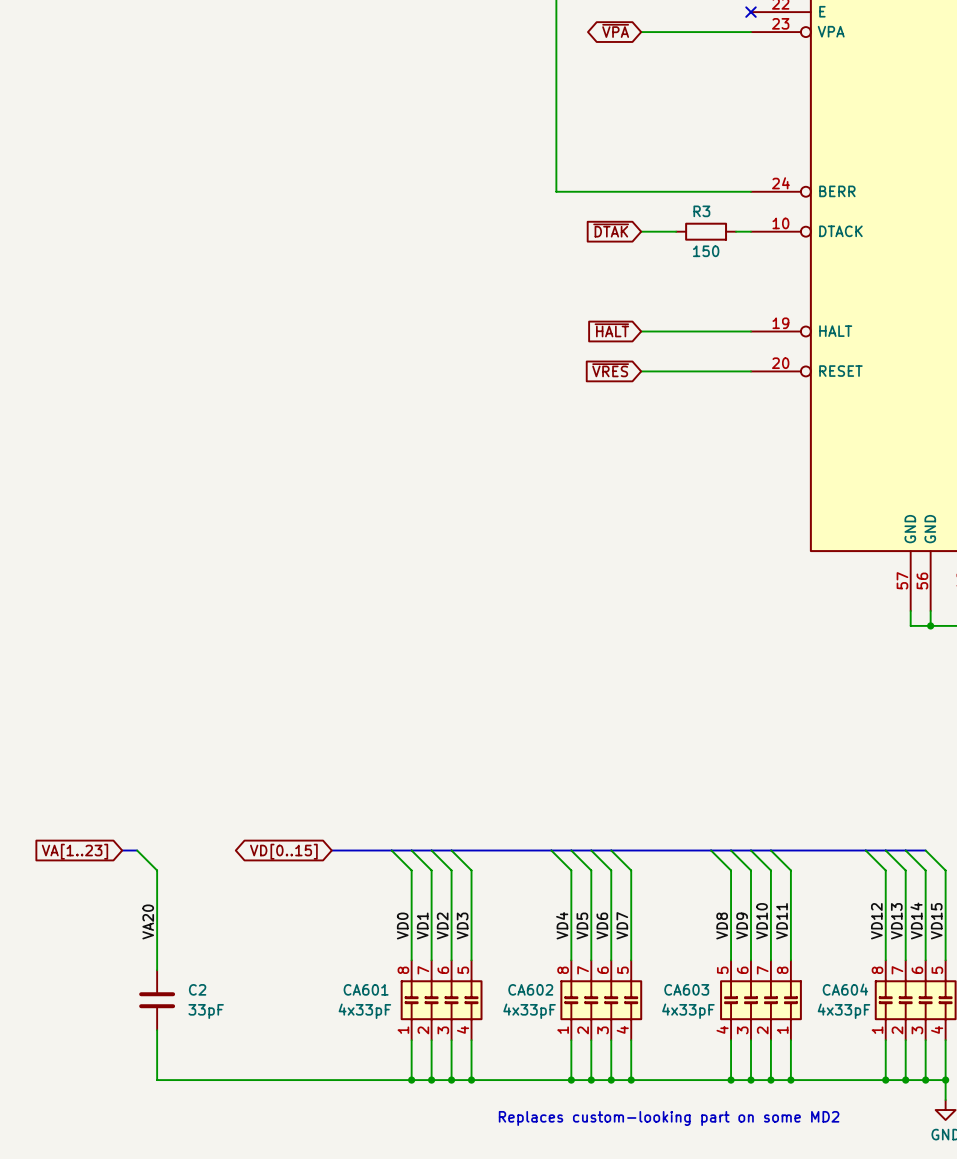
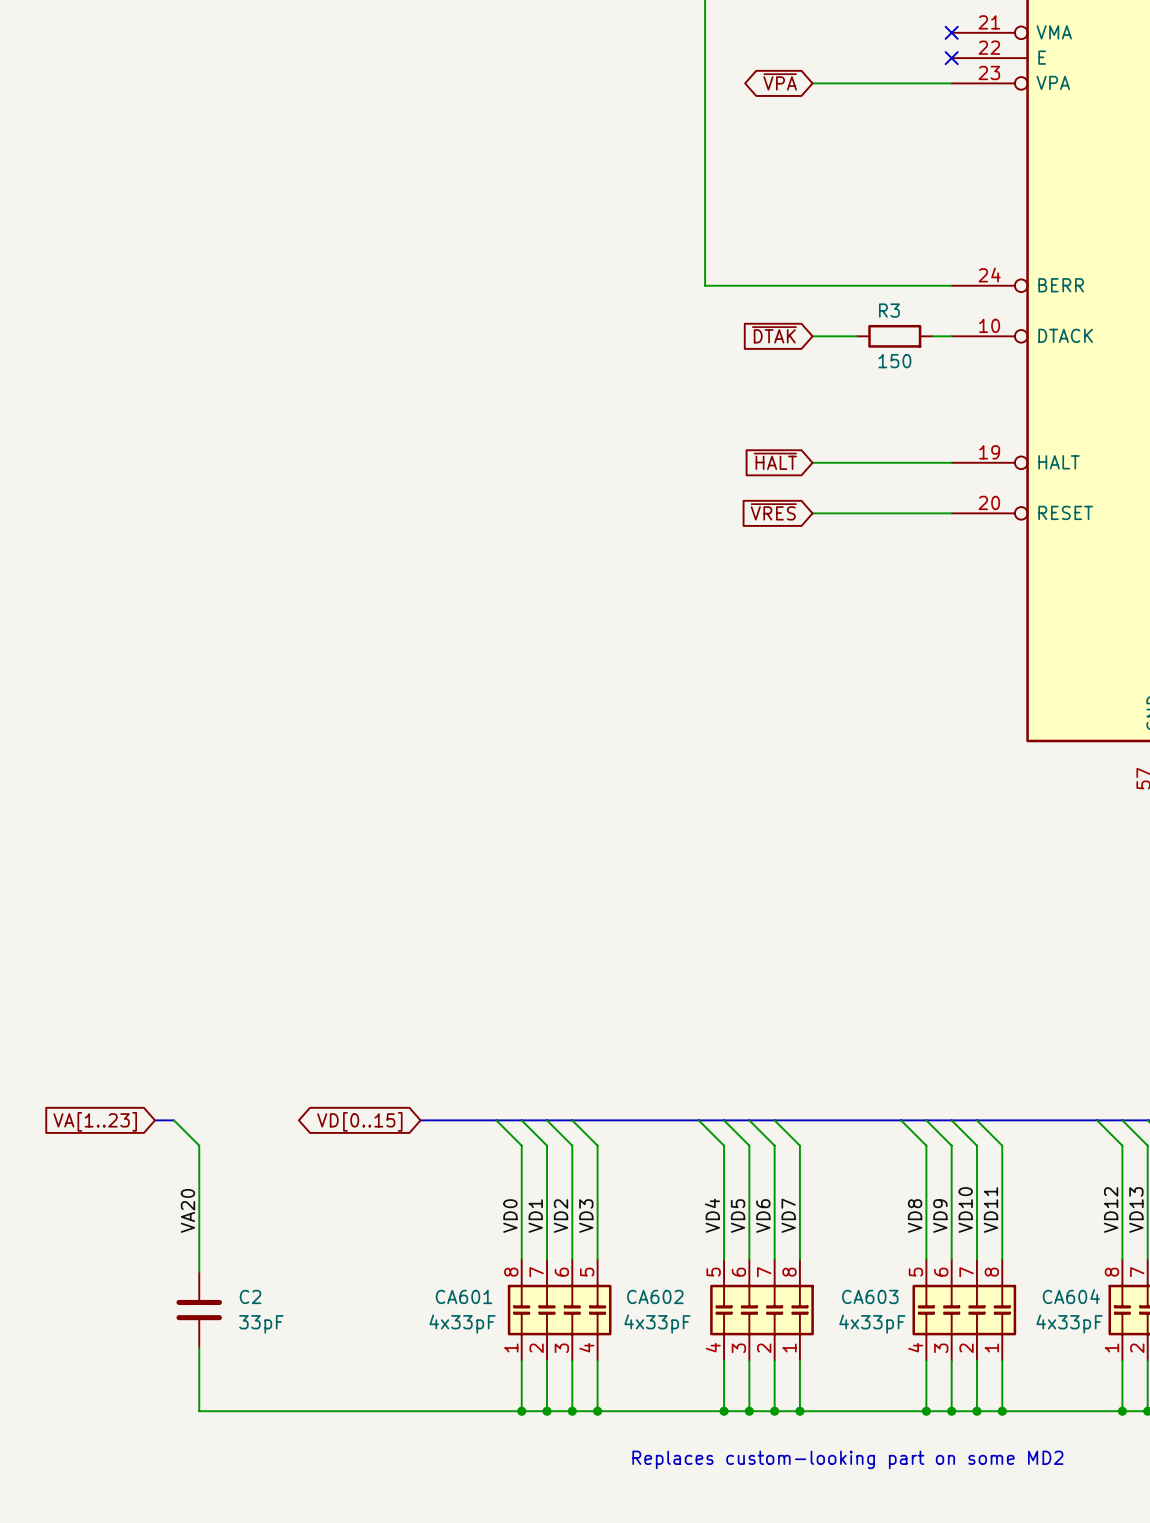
CA602 name position: CA602 (530, 989) -> CA602 (655, 1296)
CA602 flip: as is (601, 1000) -> left-right (761, 1310)
CA602 value position: 4x33pF (529, 1011) -> 4x33pF (657, 1324)

